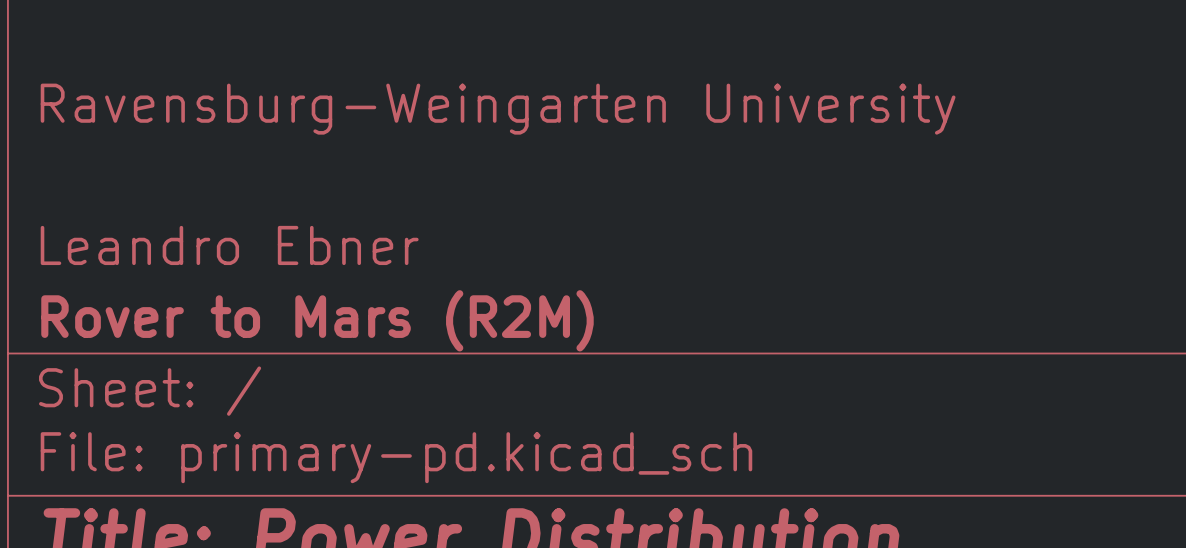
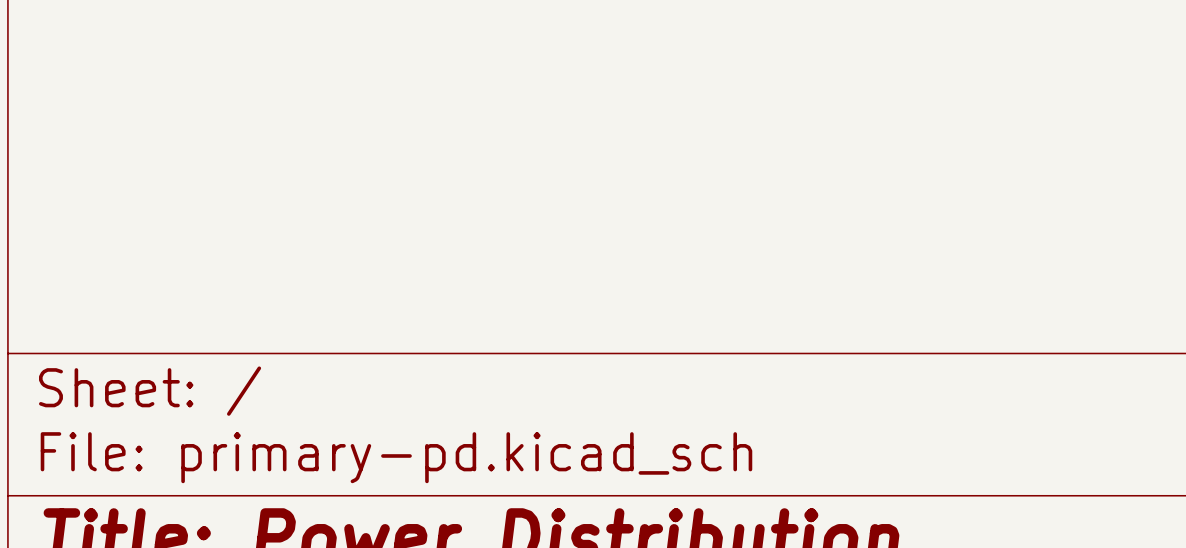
title block: Ravensburg-Weingarten University (498, 109) -> none
title block: Leandro Ebner (229, 245) -> none
title block: Rover to Mars (R2M) (317, 320) -> none

